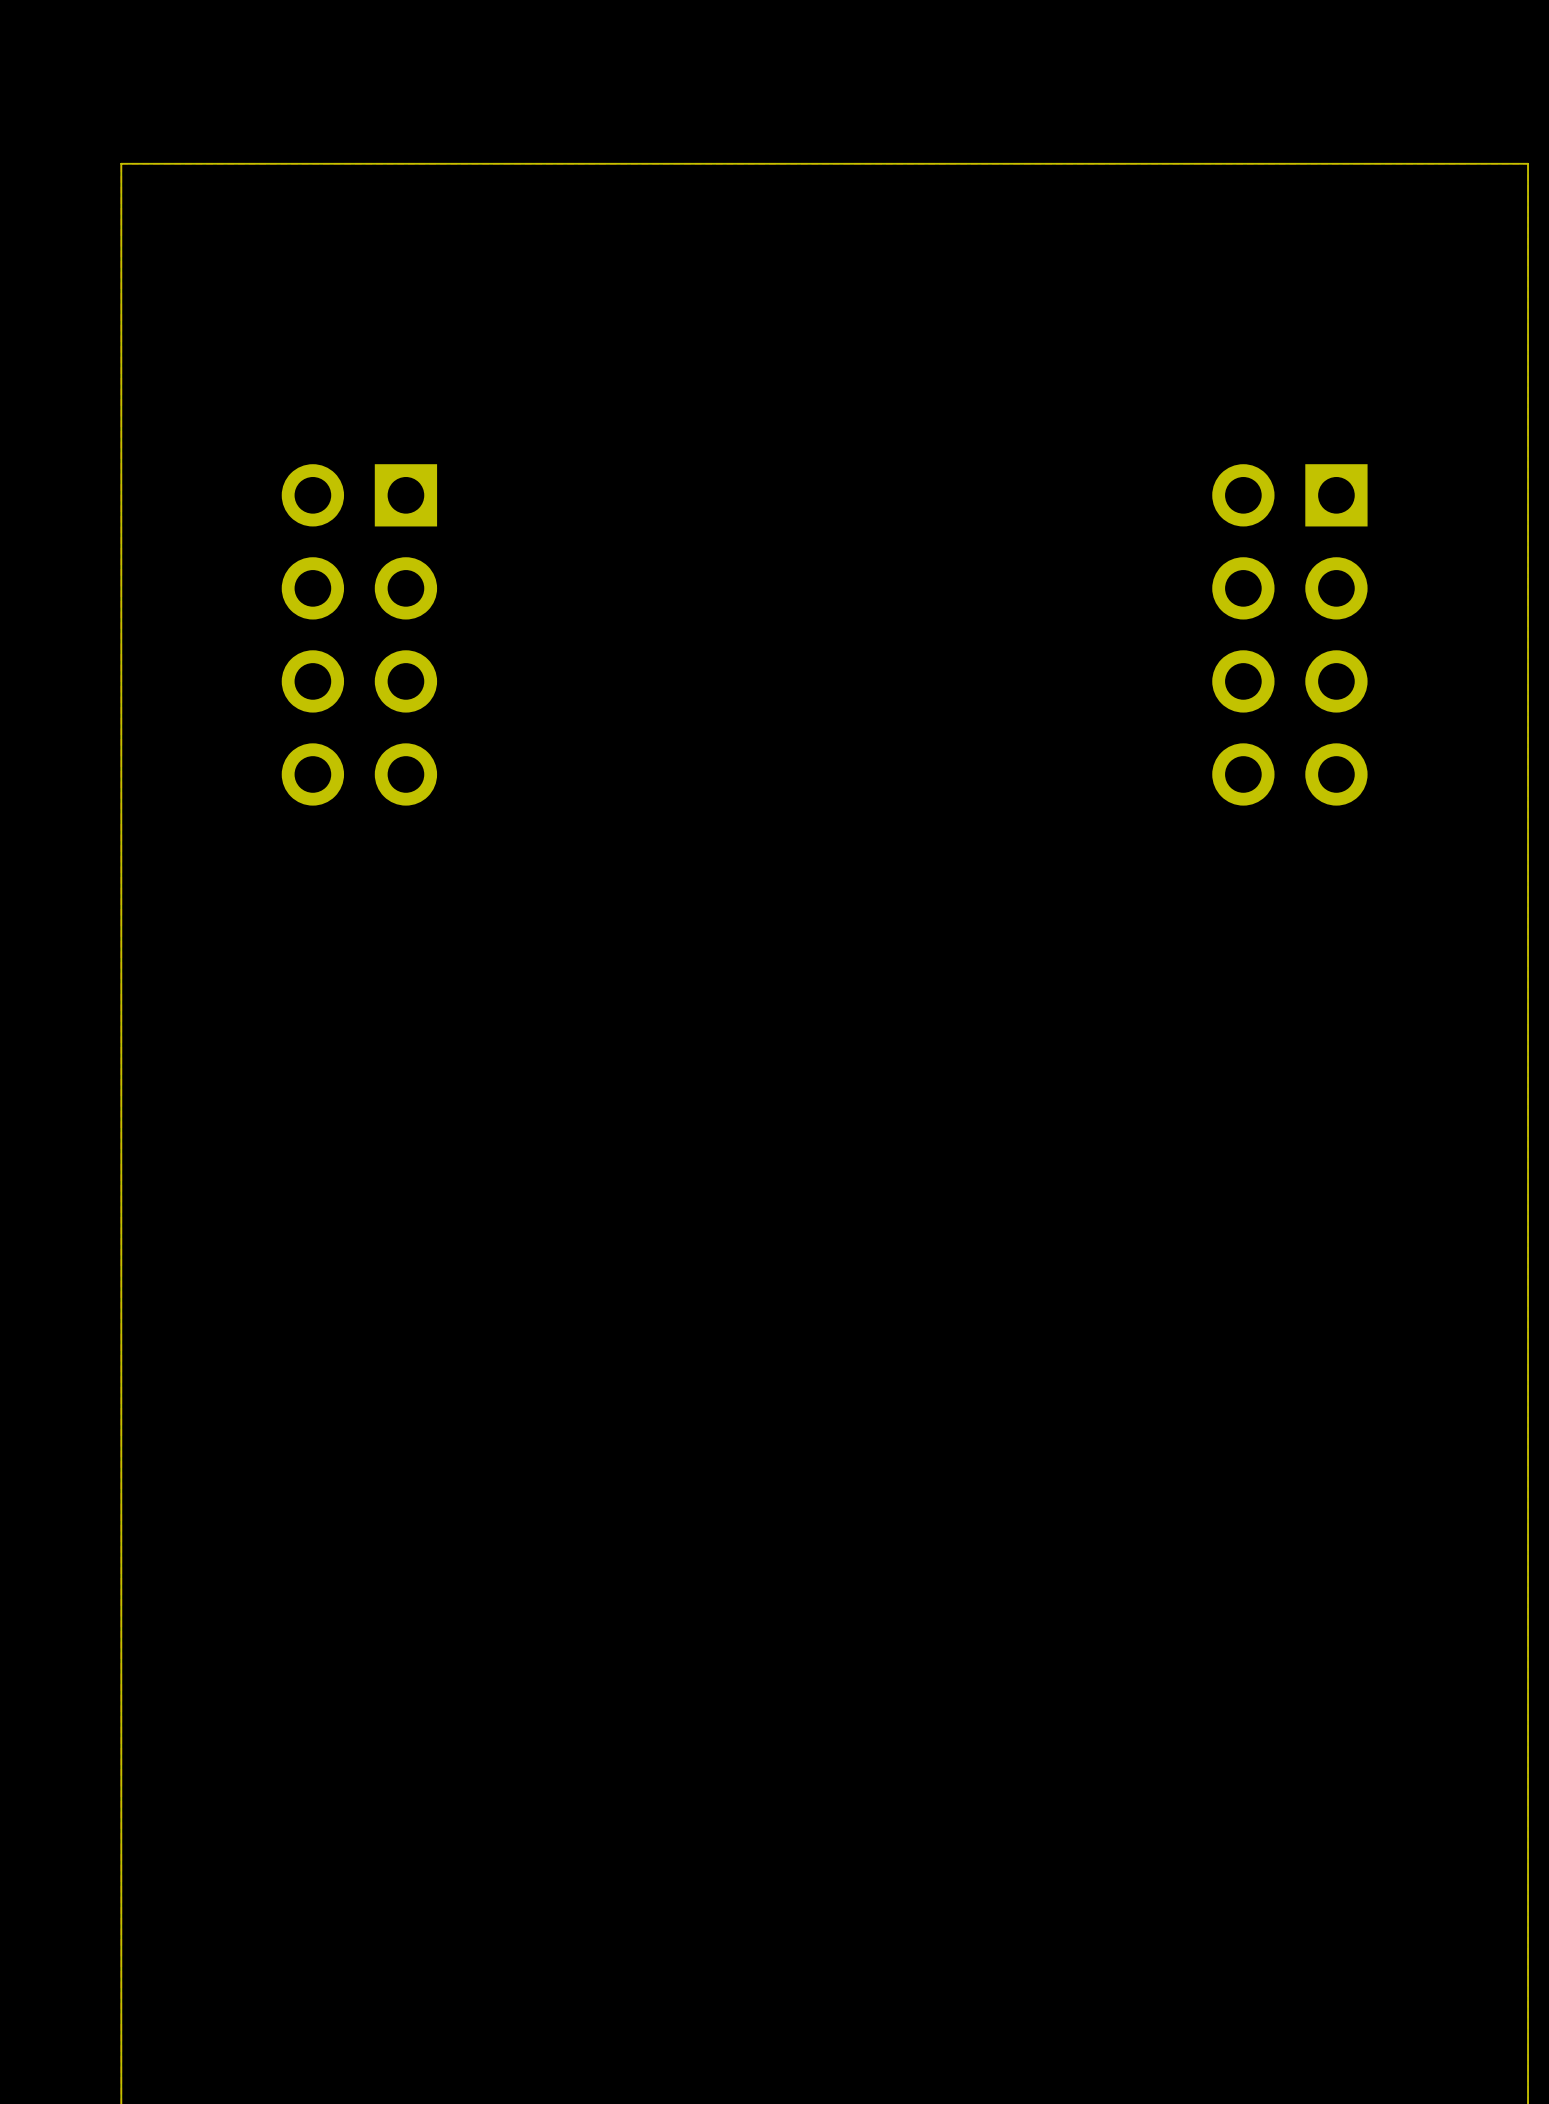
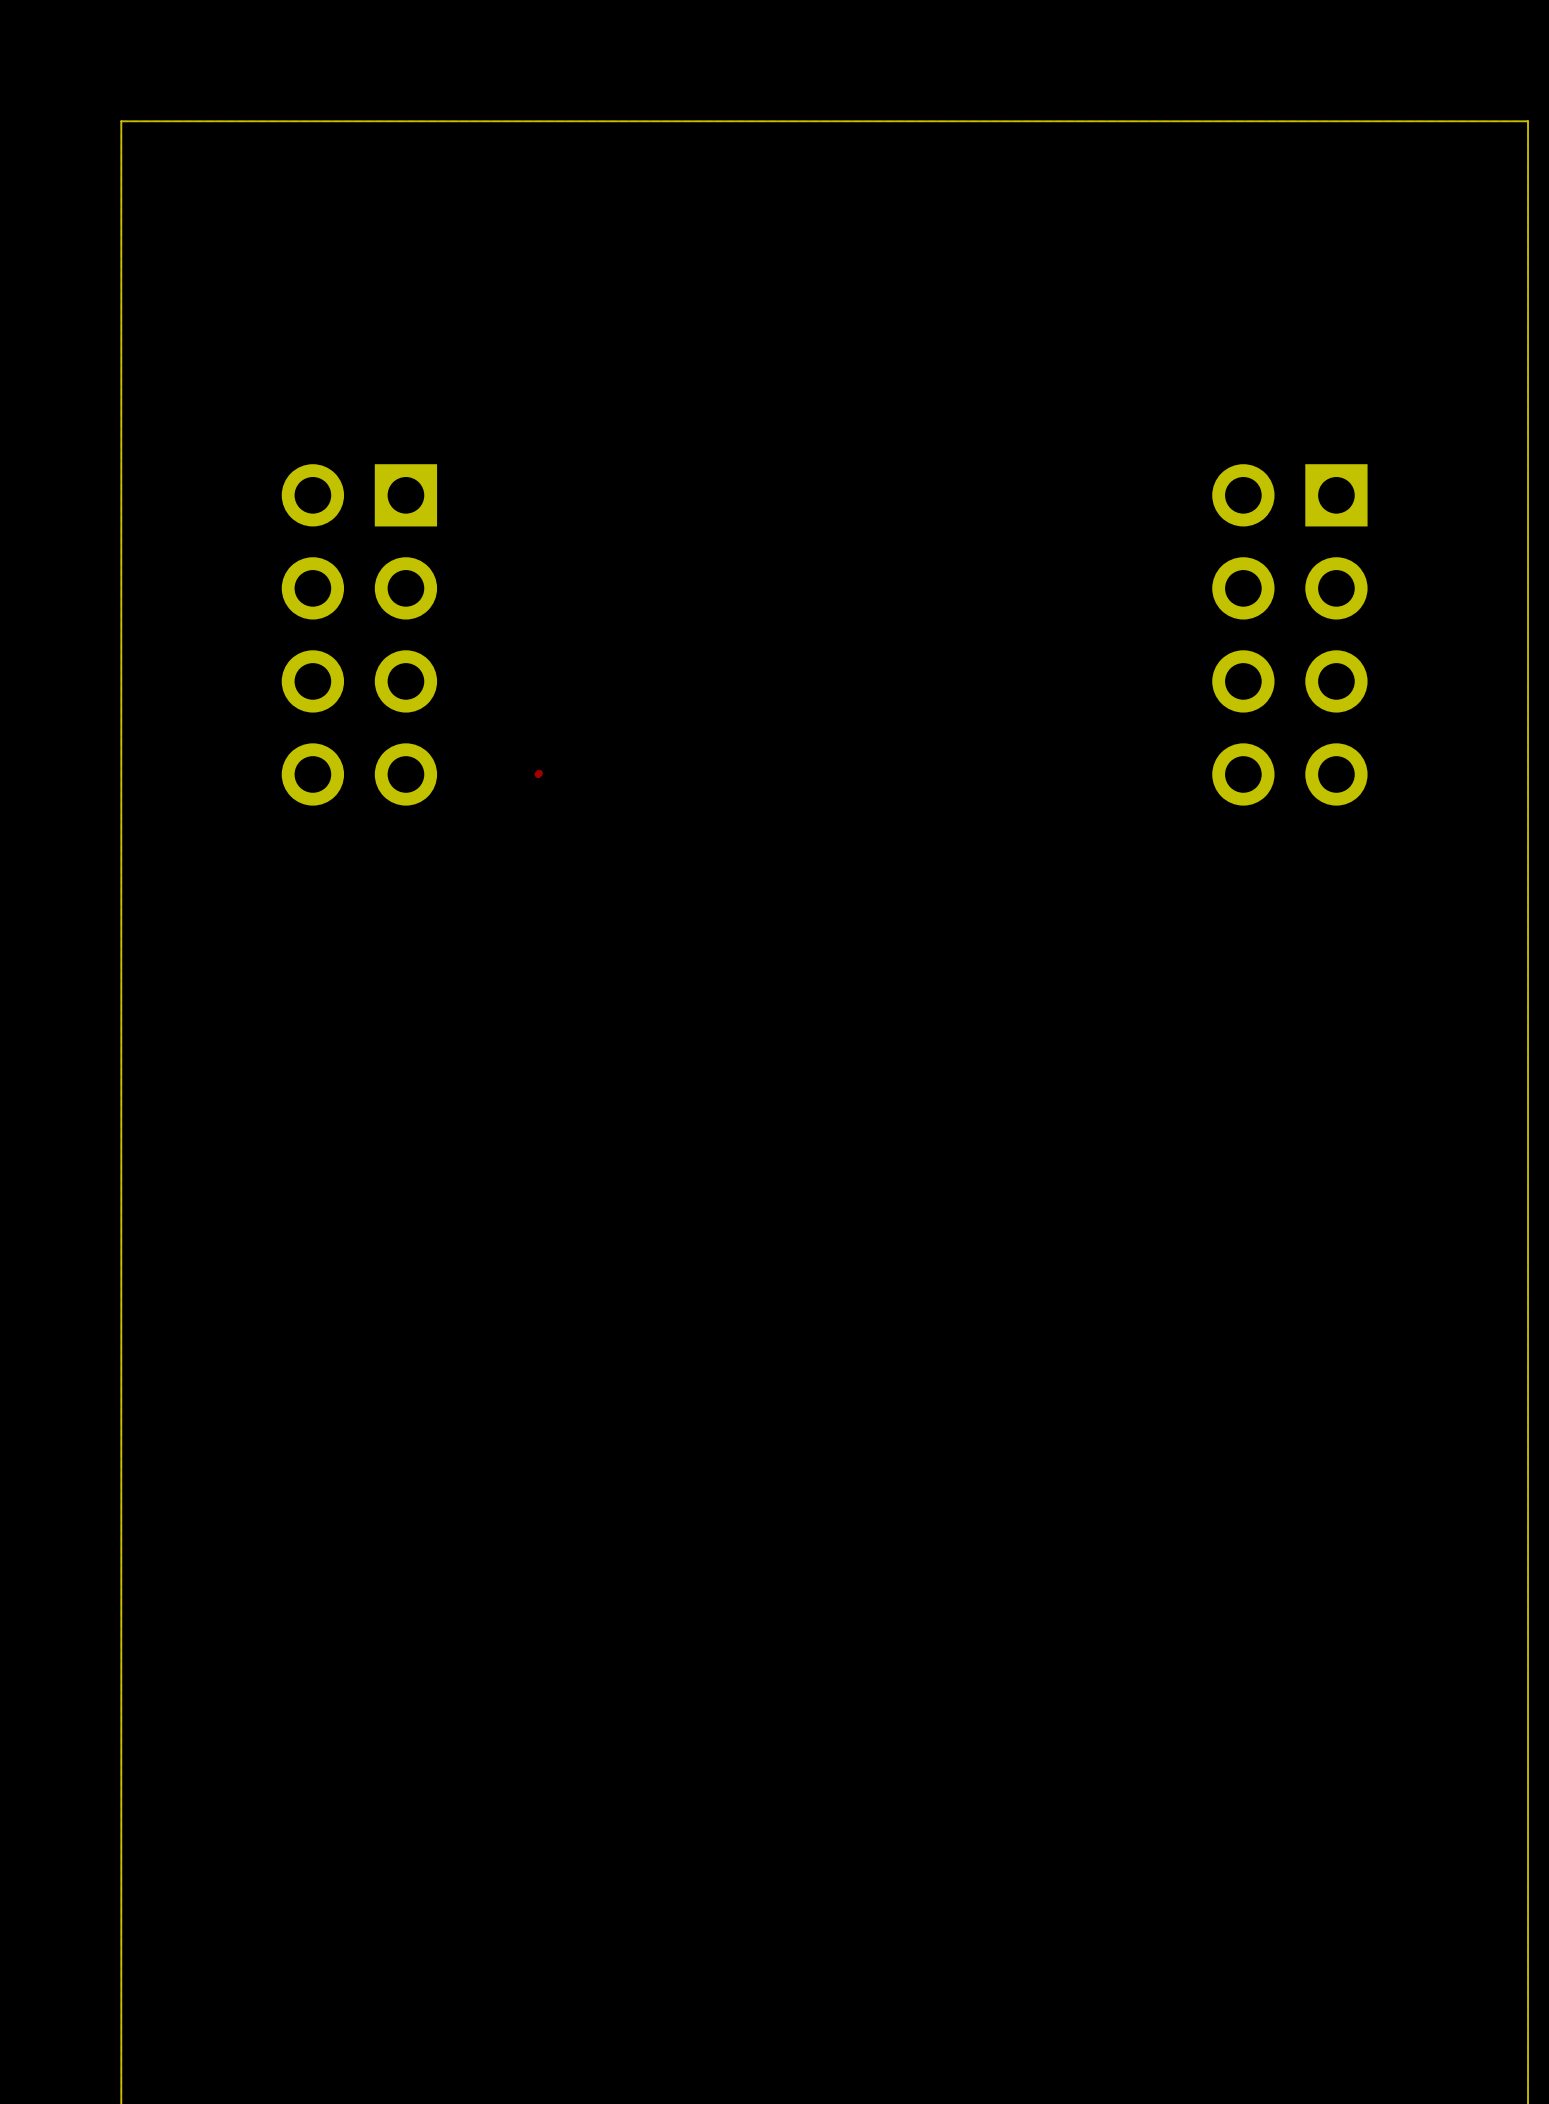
board edge: (121, 163) (1528, 163) -> (121, 163) (121, 121) (1528, 121) (1528, 163)
track: none -> (539, 773) (538, 774)

